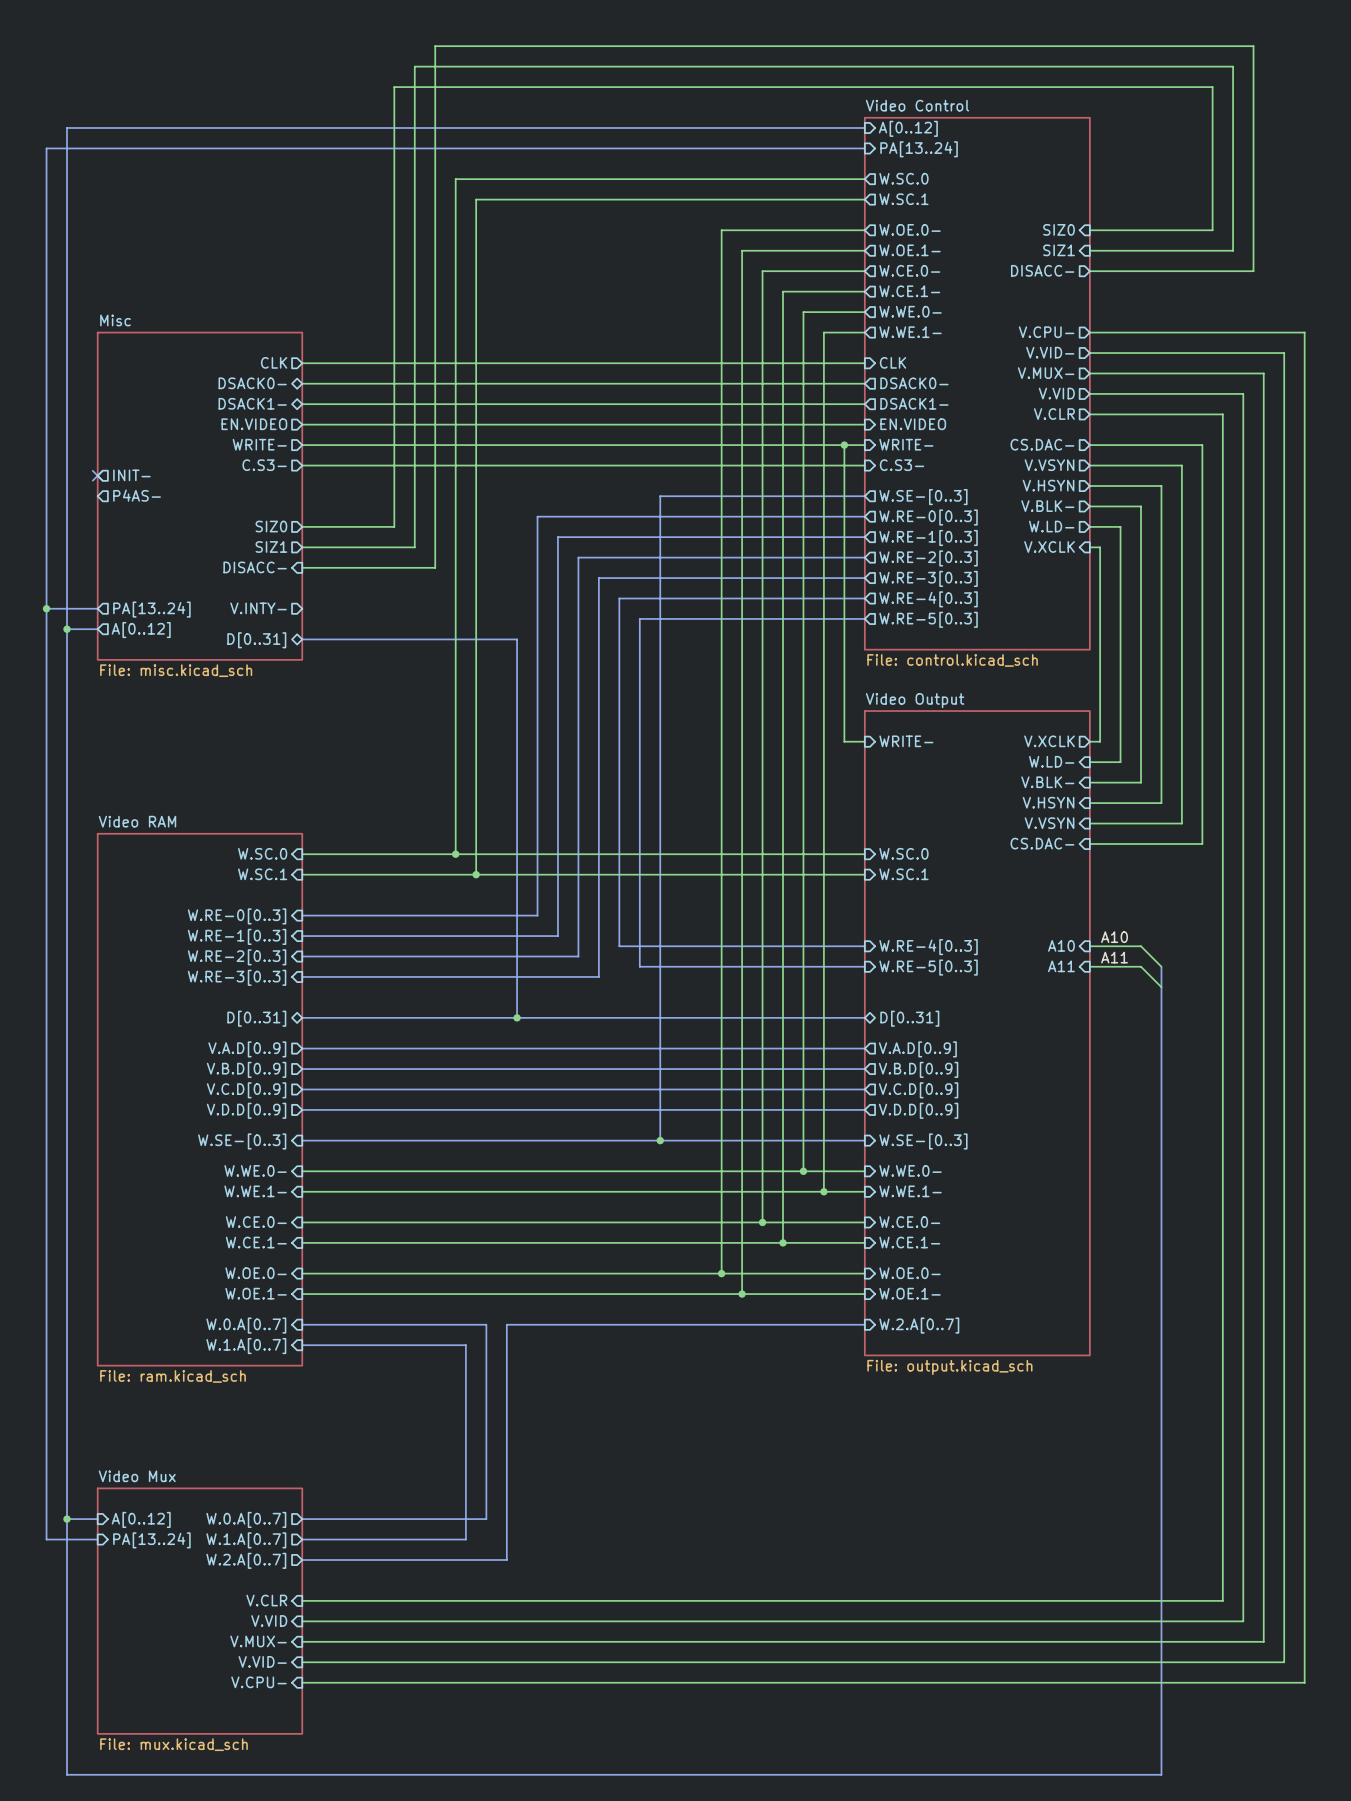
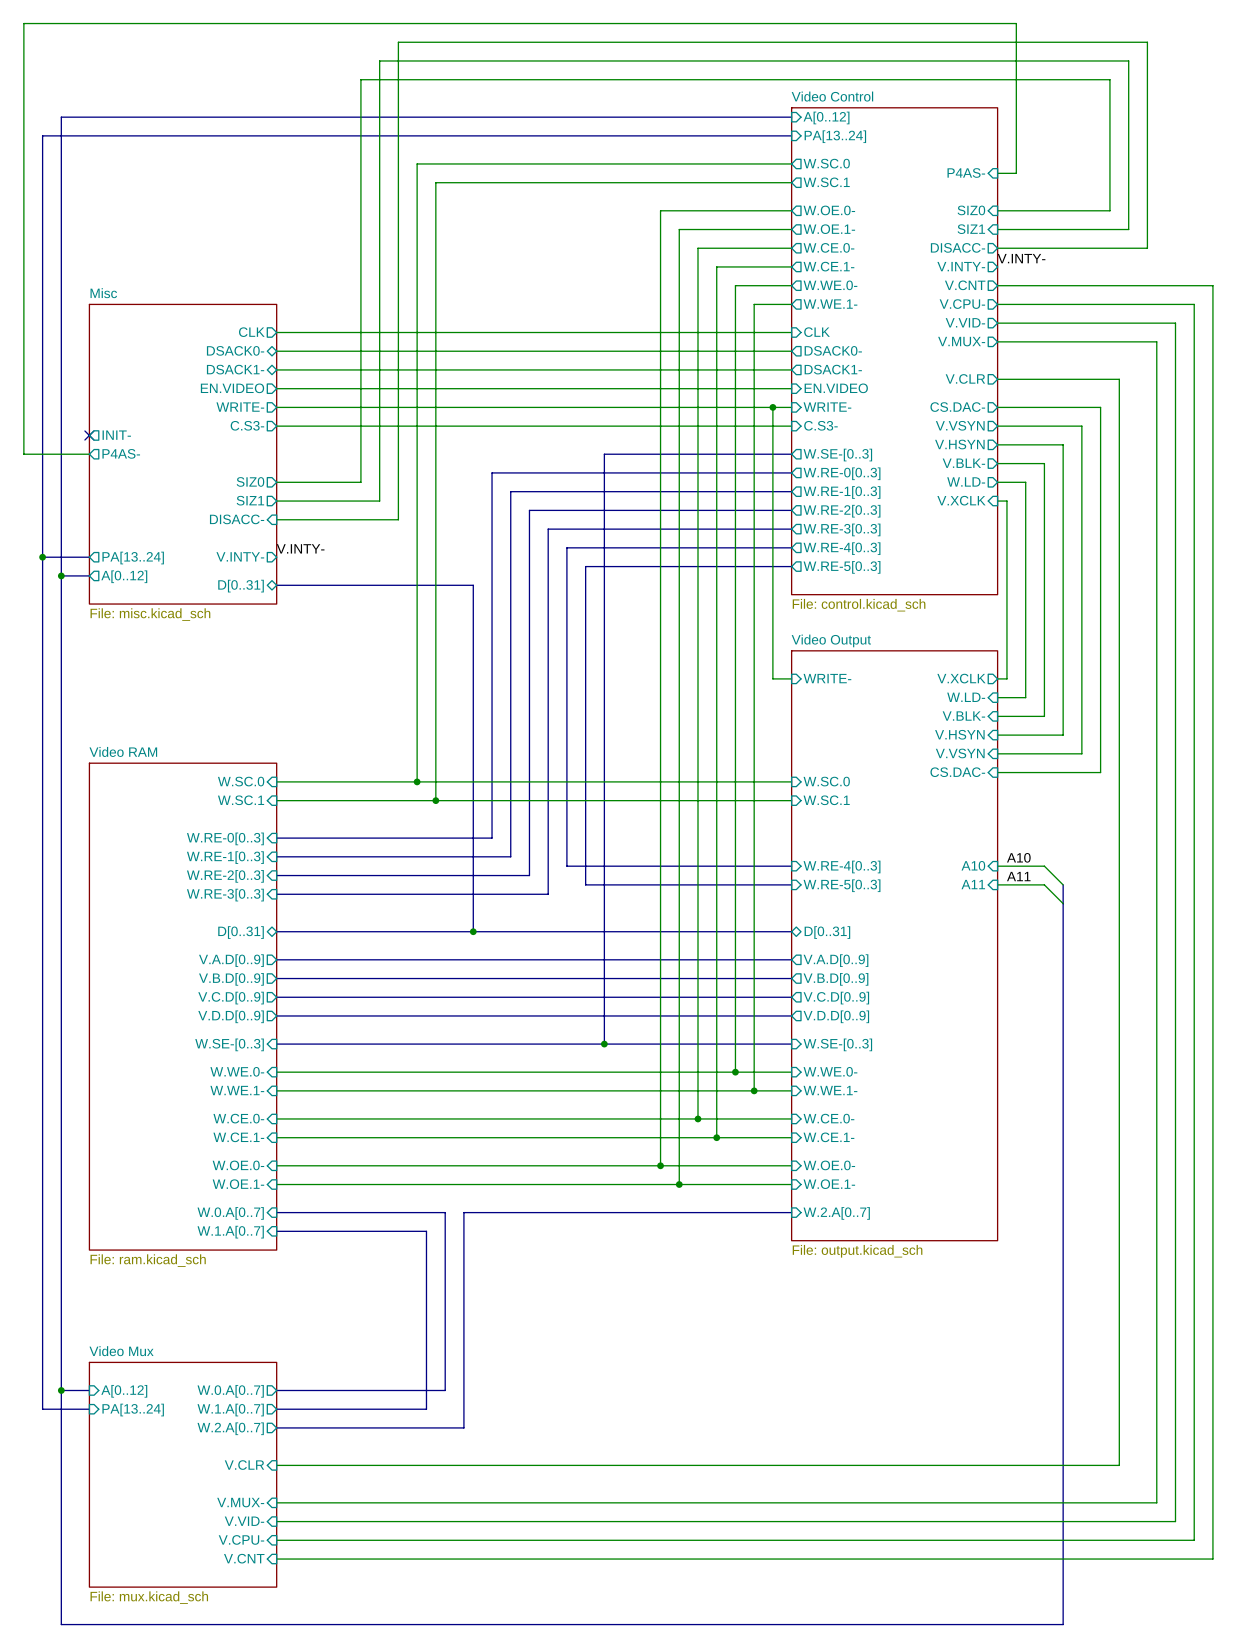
sheet pin: none -> P4AS- (966, 172)
wire: none -> (997, 173) (1016, 173) (1016, 23) (23, 23) (23, 454) (89, 454)
label: none -> V.INTY- (1021, 258)
sheet pin: none -> V.INTY- (961, 266)
sheet pin: none -> V.CNT (965, 285)
wire: none -> (997, 285) (1212, 285) (1212, 1559) (276, 1559)
sheet pin: V.VID (1056, 393) -> none
wire: (1089, 393) (1243, 393) (1243, 1621) (302, 1621) -> none
label: none -> V.INTY- (300, 548)
sheet pin: V.VID (269, 1620) -> none
sheet pin: none -> V.CNT (244, 1558)

